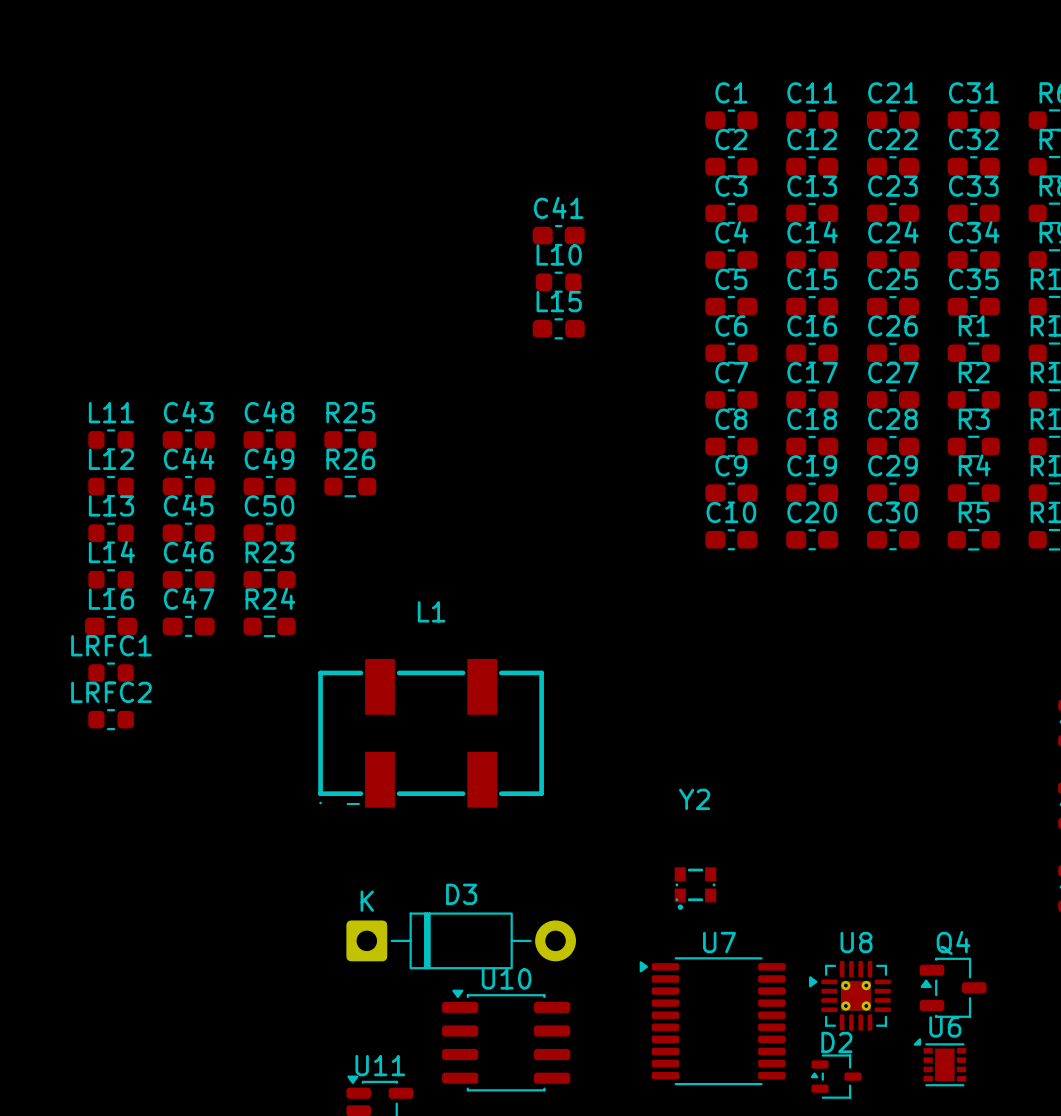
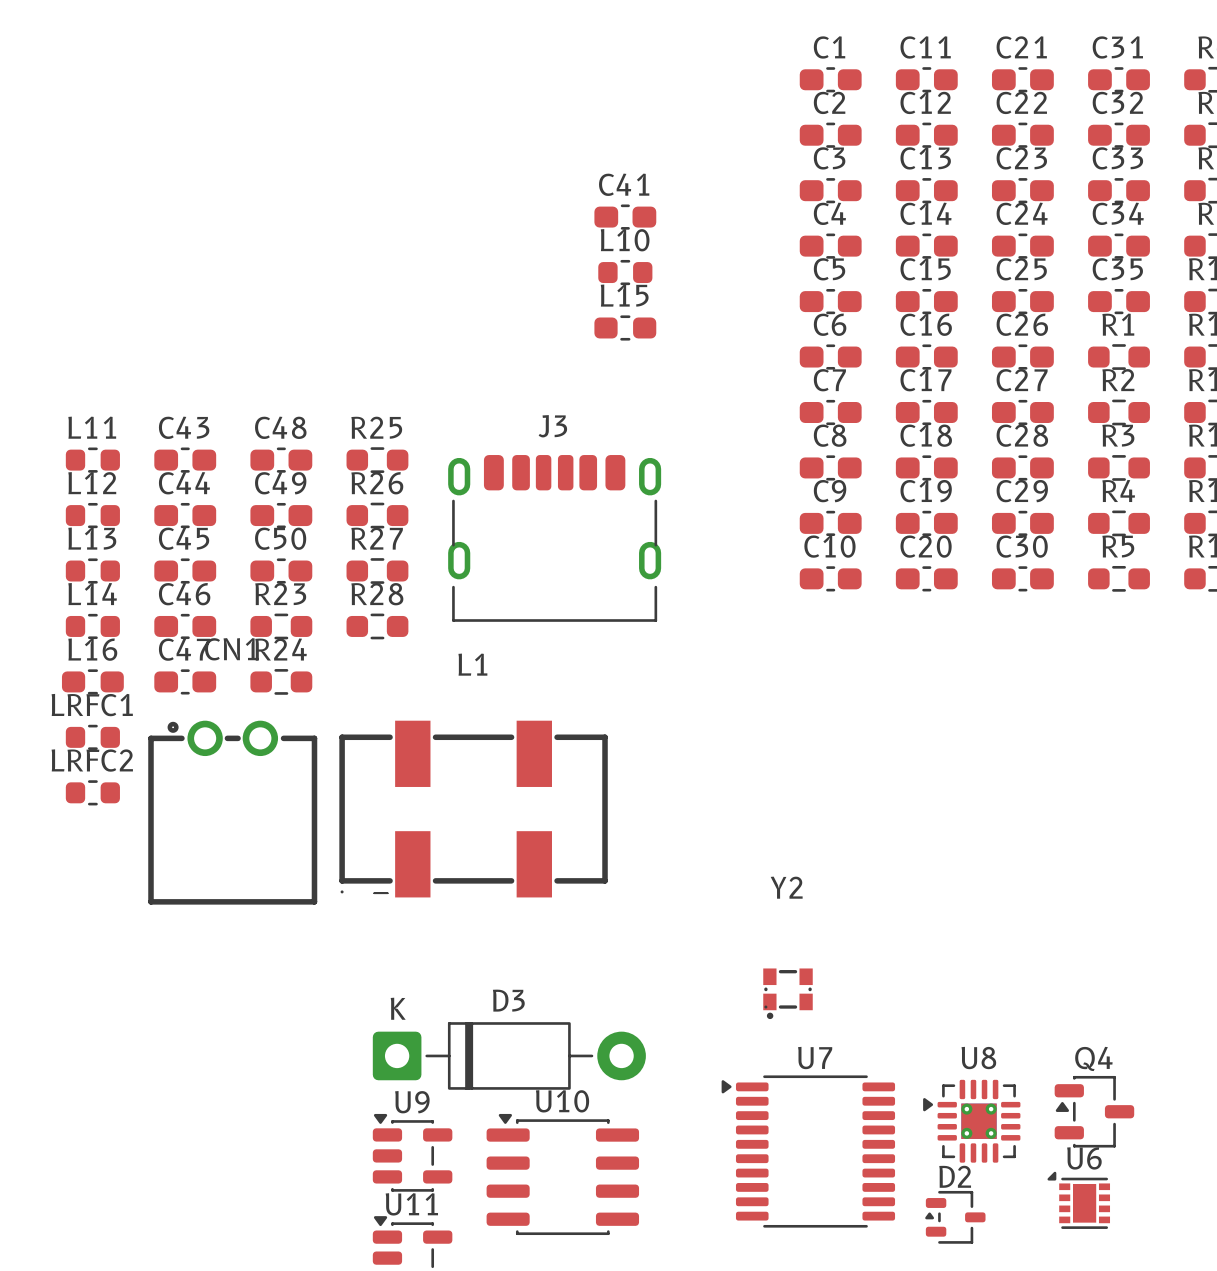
J3: none -> (554, 538)
R27: none -> (377, 571)
R28: none -> (377, 626)
CN1: none -> (232, 812)
U9: none -> (412, 1152)

